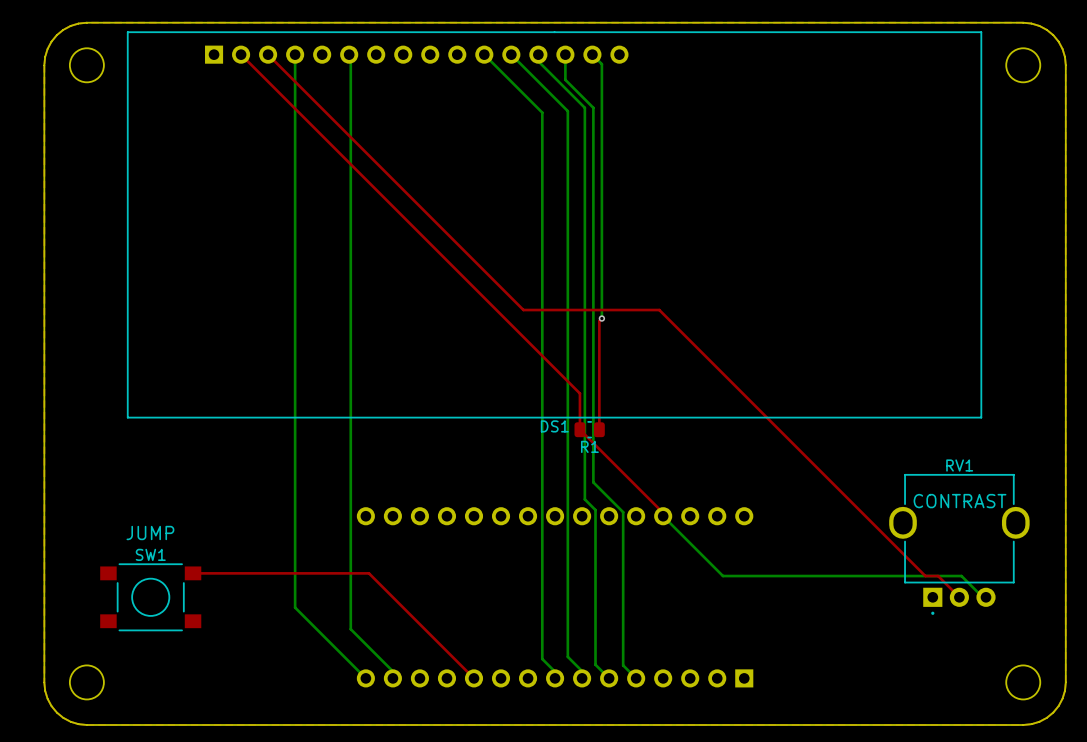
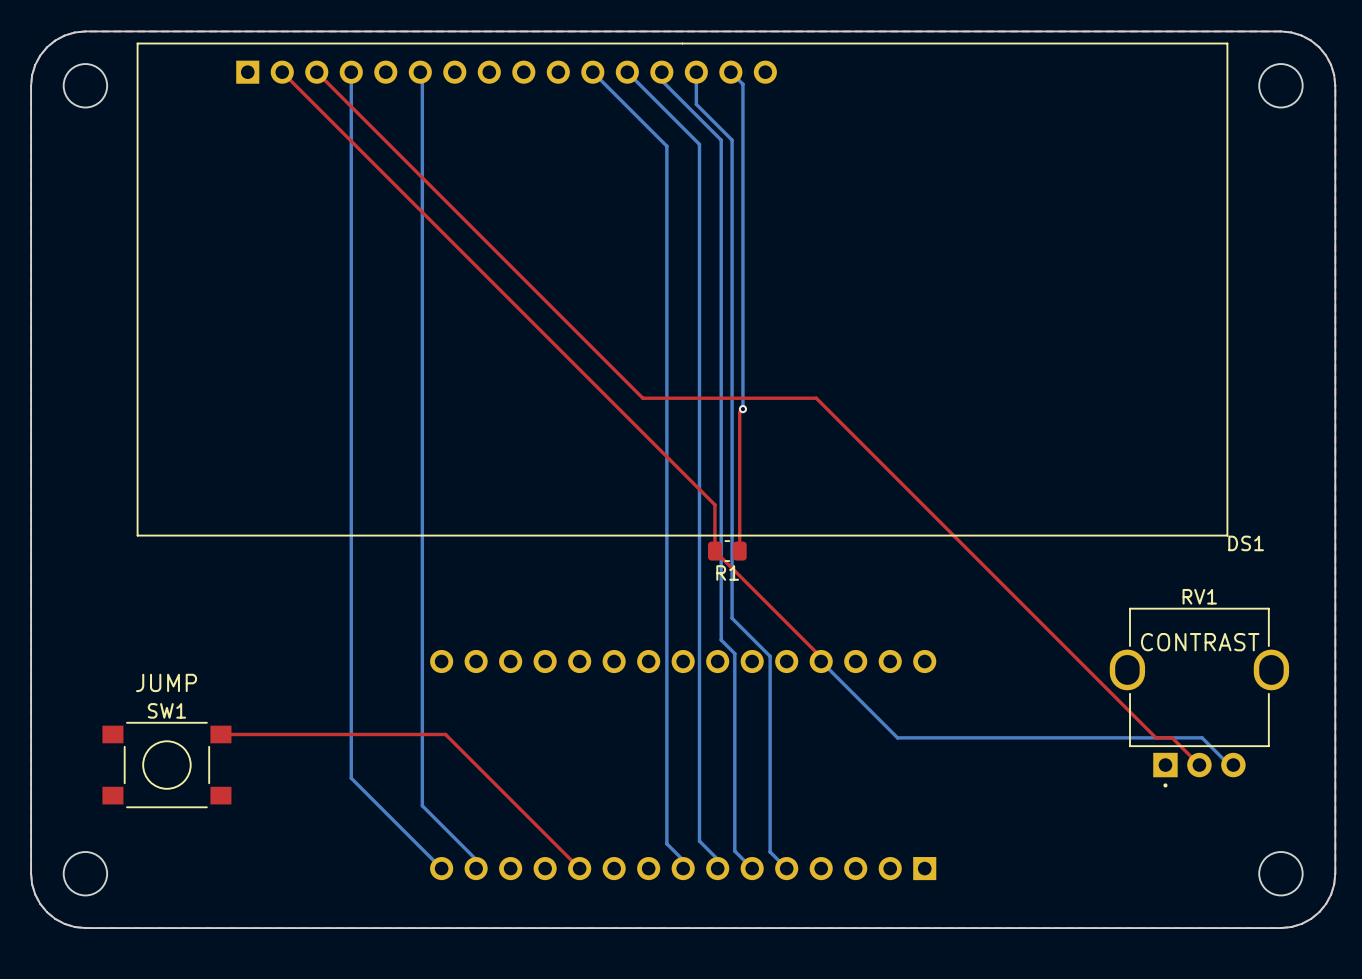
DS1 name position: DS1 (554, 426) -> DS1 (1246, 543)

